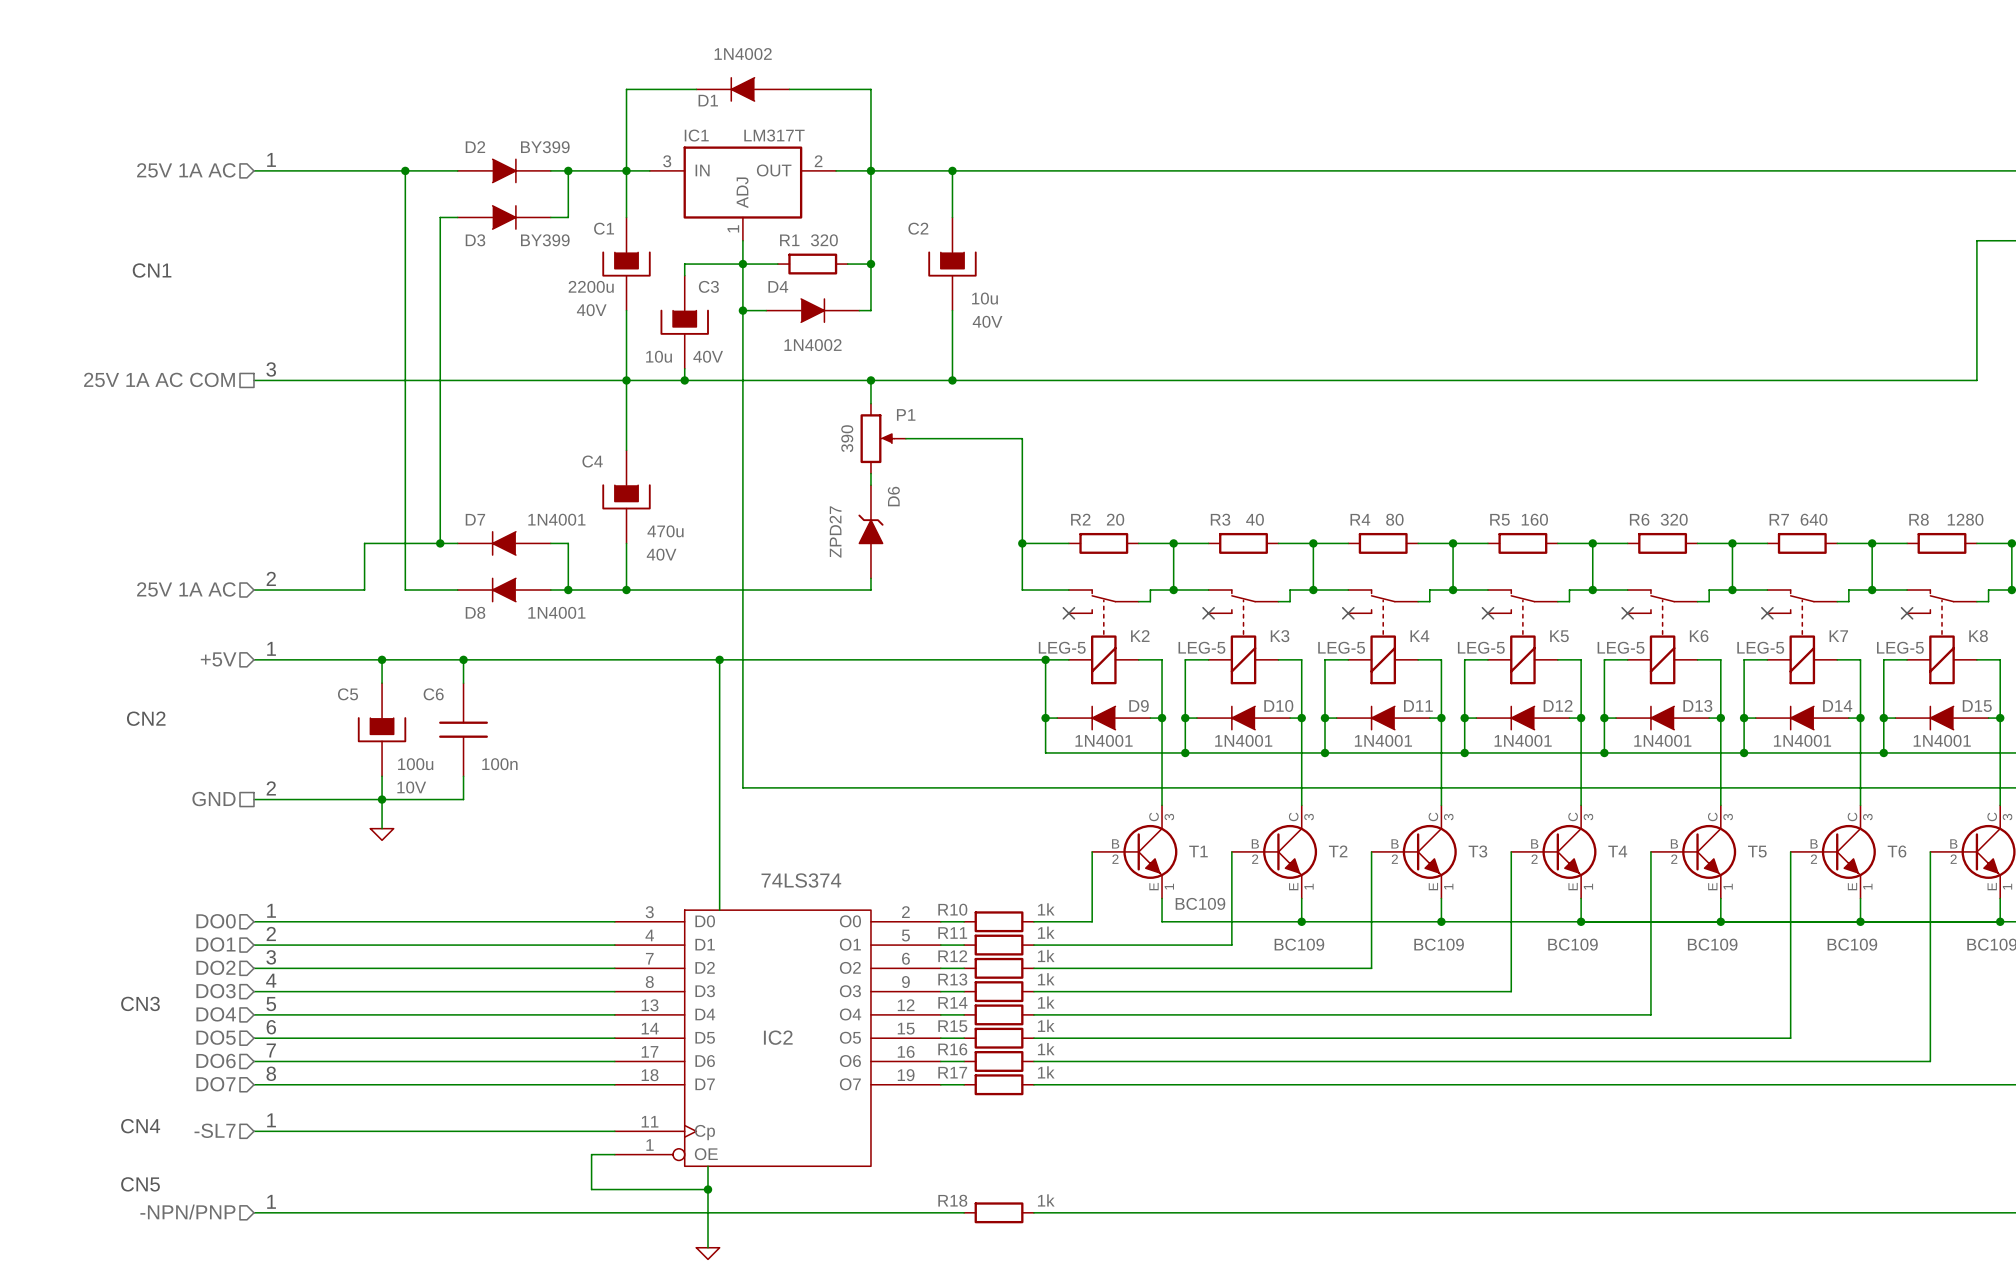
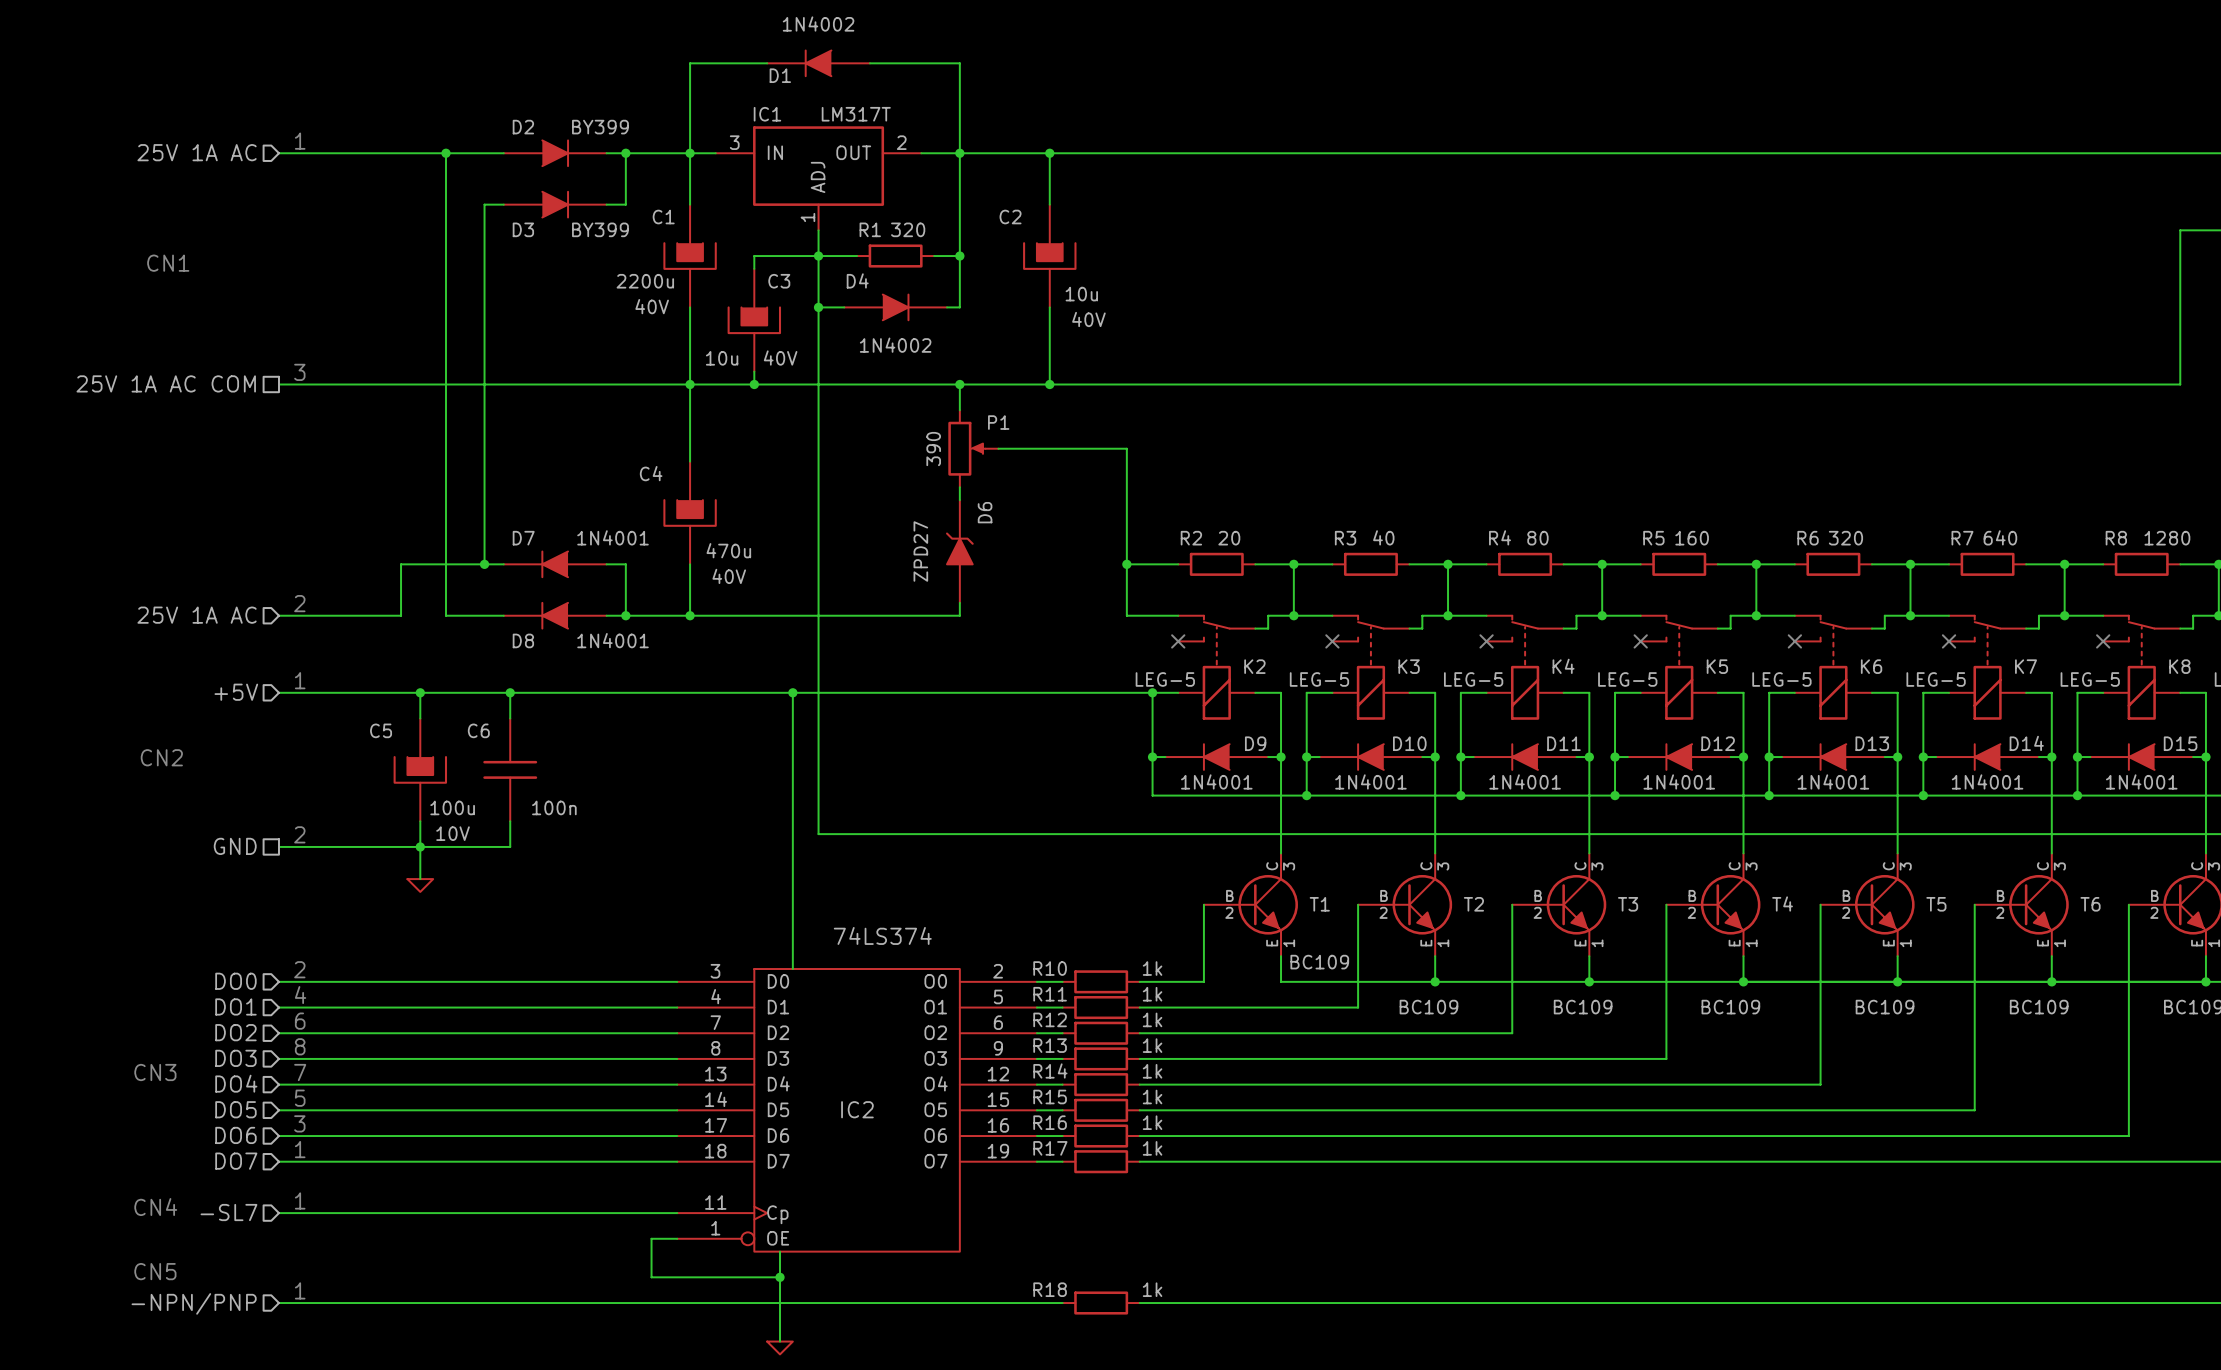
text: 1 (271, 910) -> 2 (299, 969)
text: 2 (271, 933) -> 4 (300, 995)
text: 3 (271, 957) -> 6 (300, 1021)
text: 4 (271, 980) -> 8 (300, 1046)
text: 5 (271, 1004) -> 7 (300, 1072)
text: 6 (271, 1027) -> 5 (300, 1098)
text: 7 (271, 1050) -> 3 (299, 1123)
text: 8 (271, 1073) -> 1 (300, 1149)

